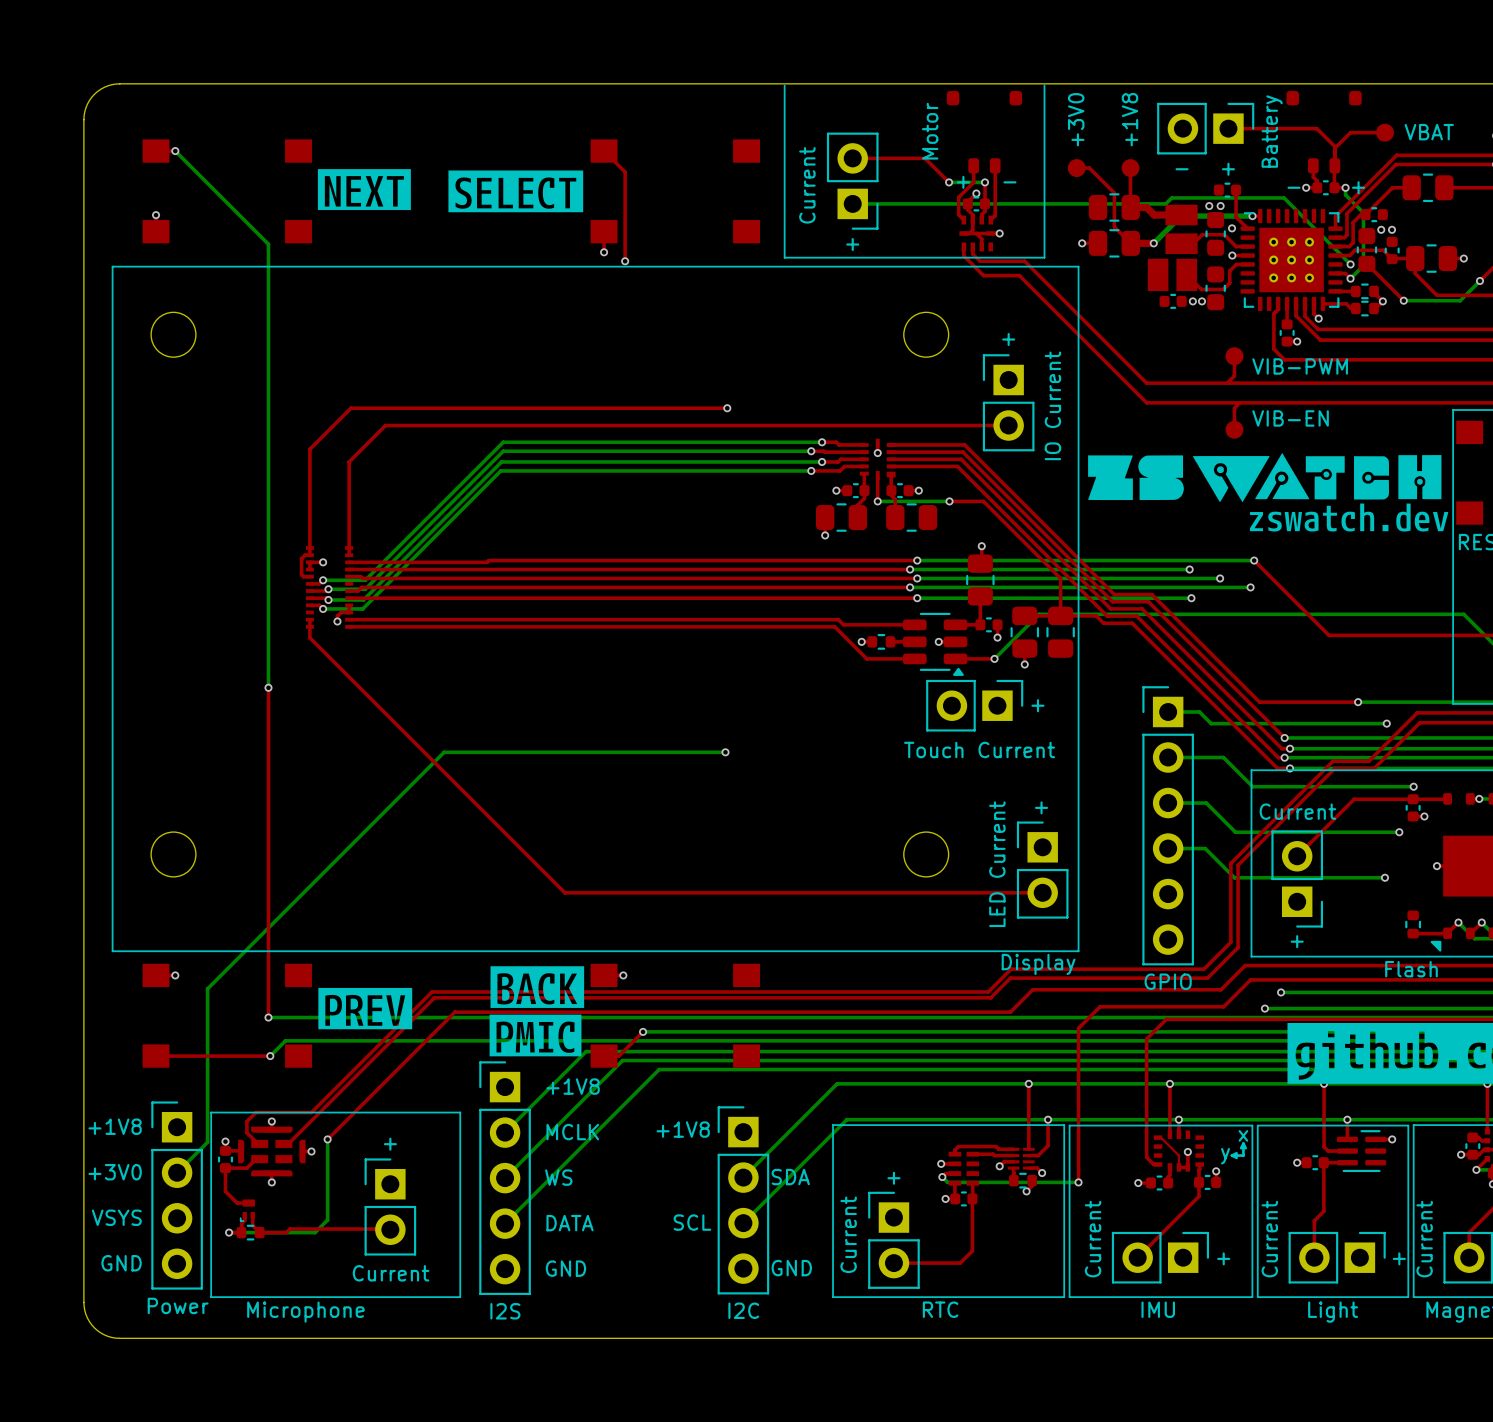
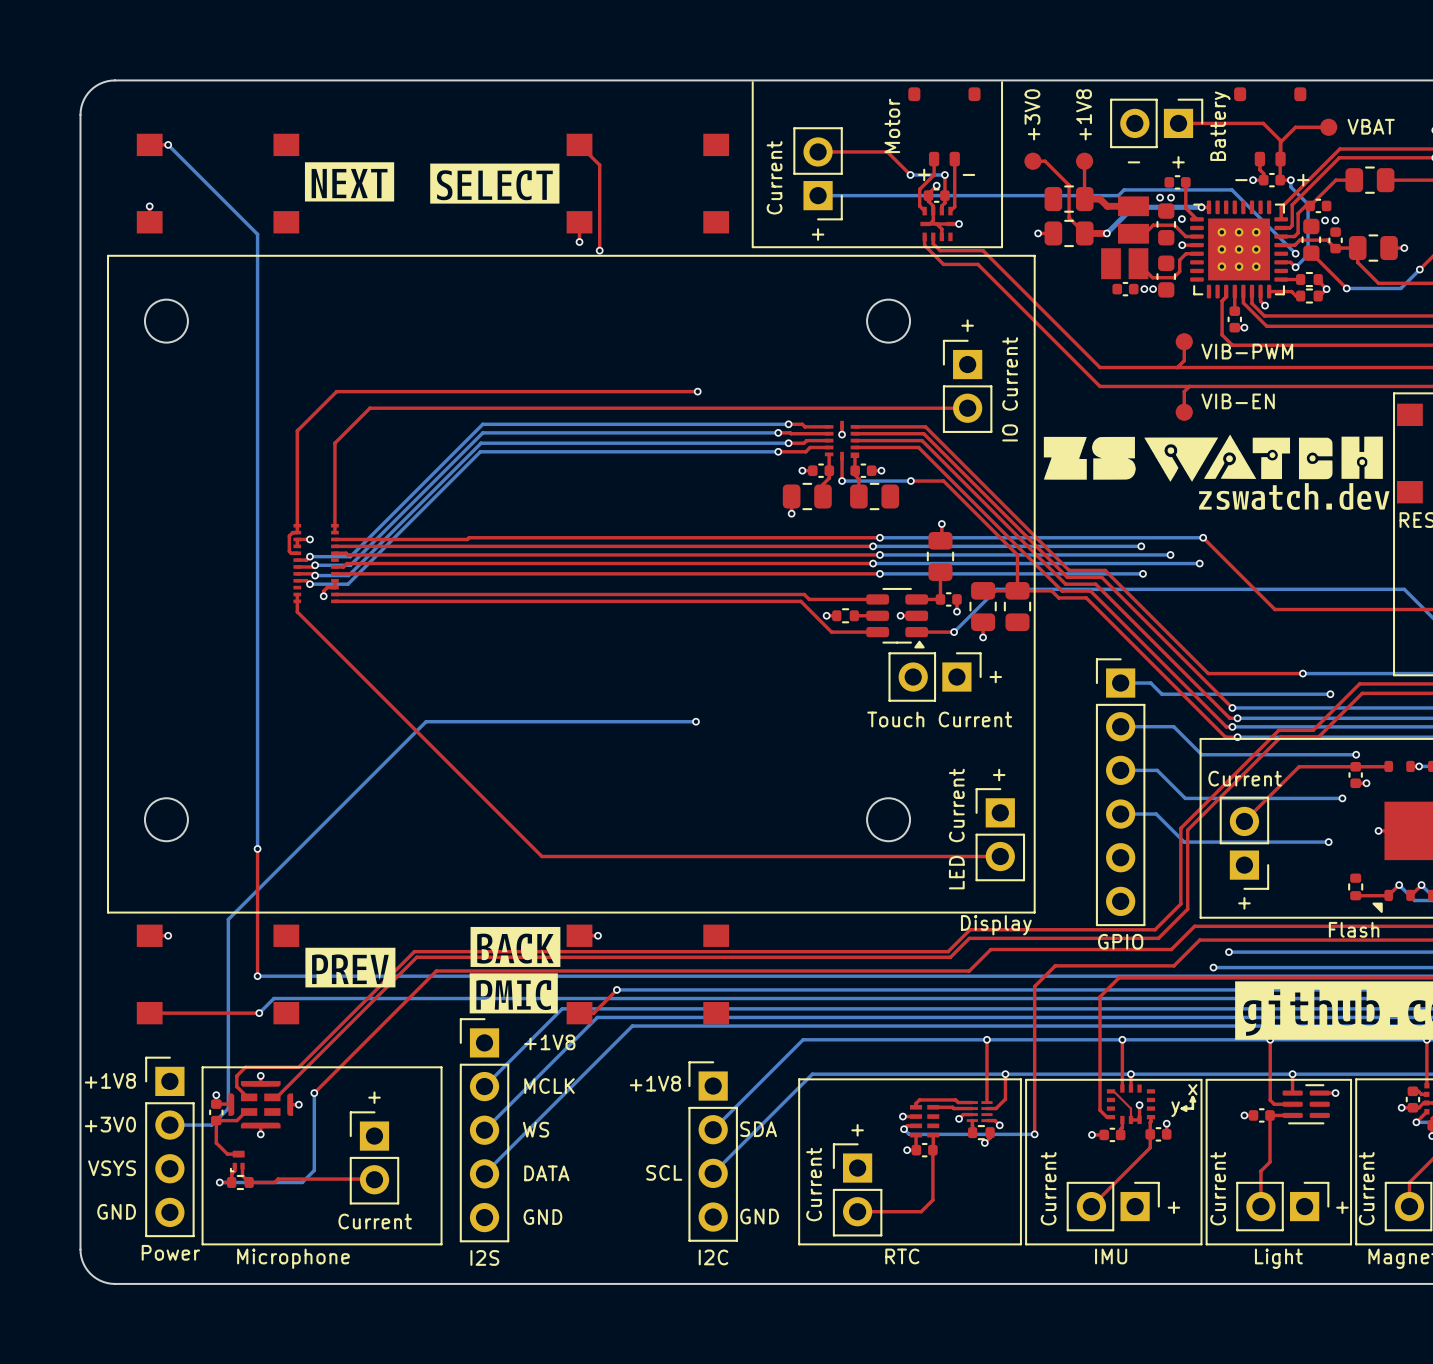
top track: (268, 687) (268, 884) -> none
bottom track: none -> (257, 659) (257, 848)
via: (268, 687) -> none
via: none -> (257, 848)
bottom track: (238, 958) (207, 988) (207, 1142) (177, 1172) -> (228, 919) (228, 1108) (211, 1125) (169, 1125)

